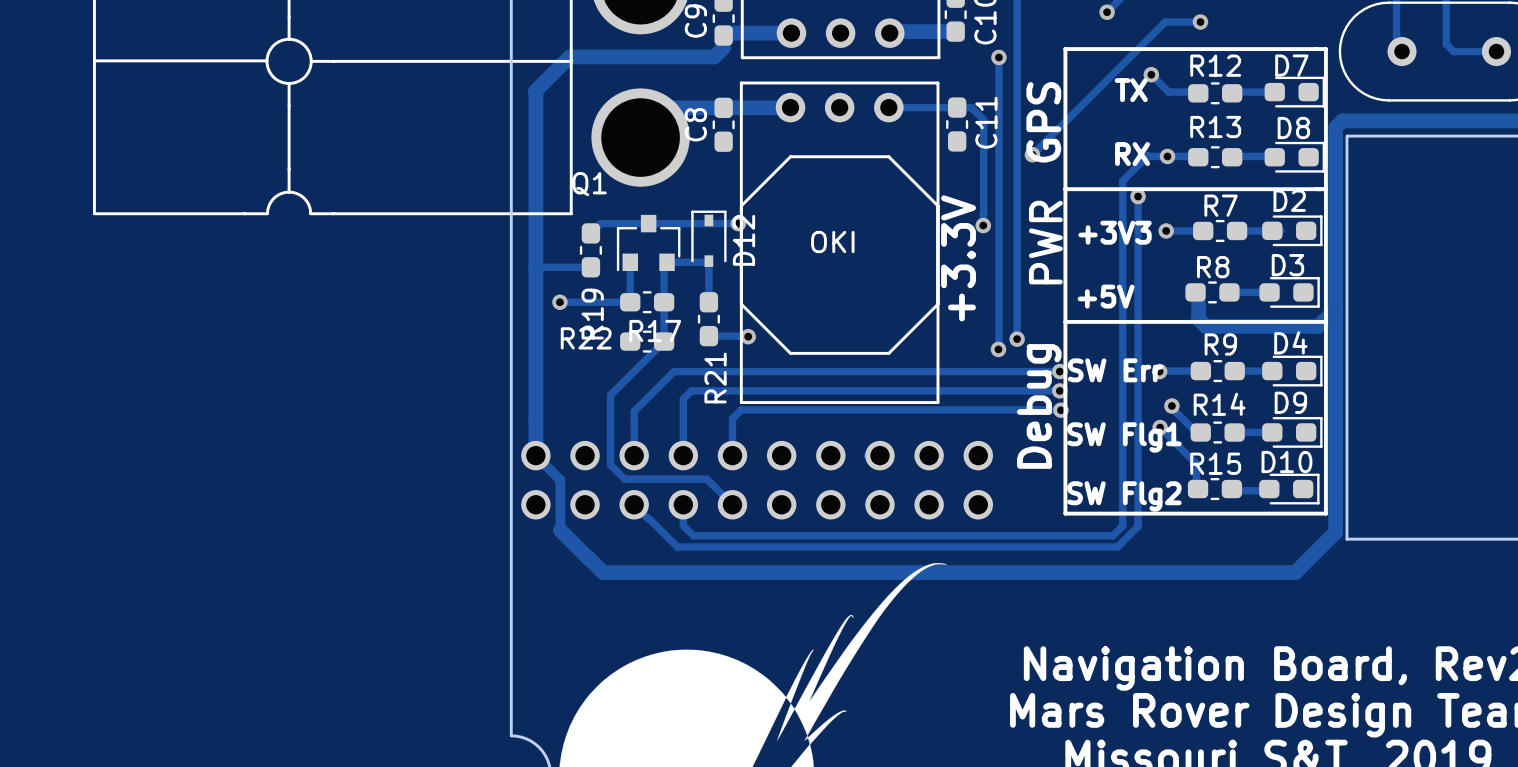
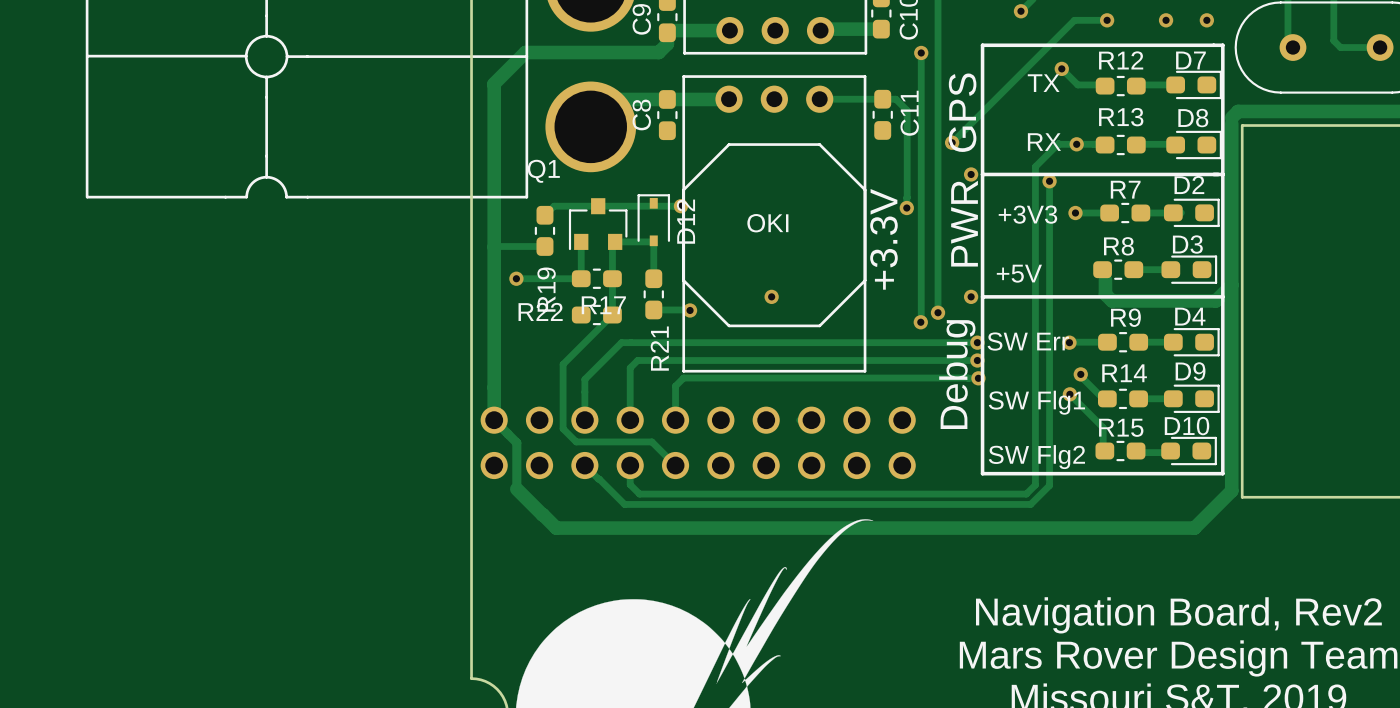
via: none -> (1166, 20)
via: none -> (1206, 20)
via: none -> (971, 174)
via: none -> (771, 296)
via: none -> (971, 296)

